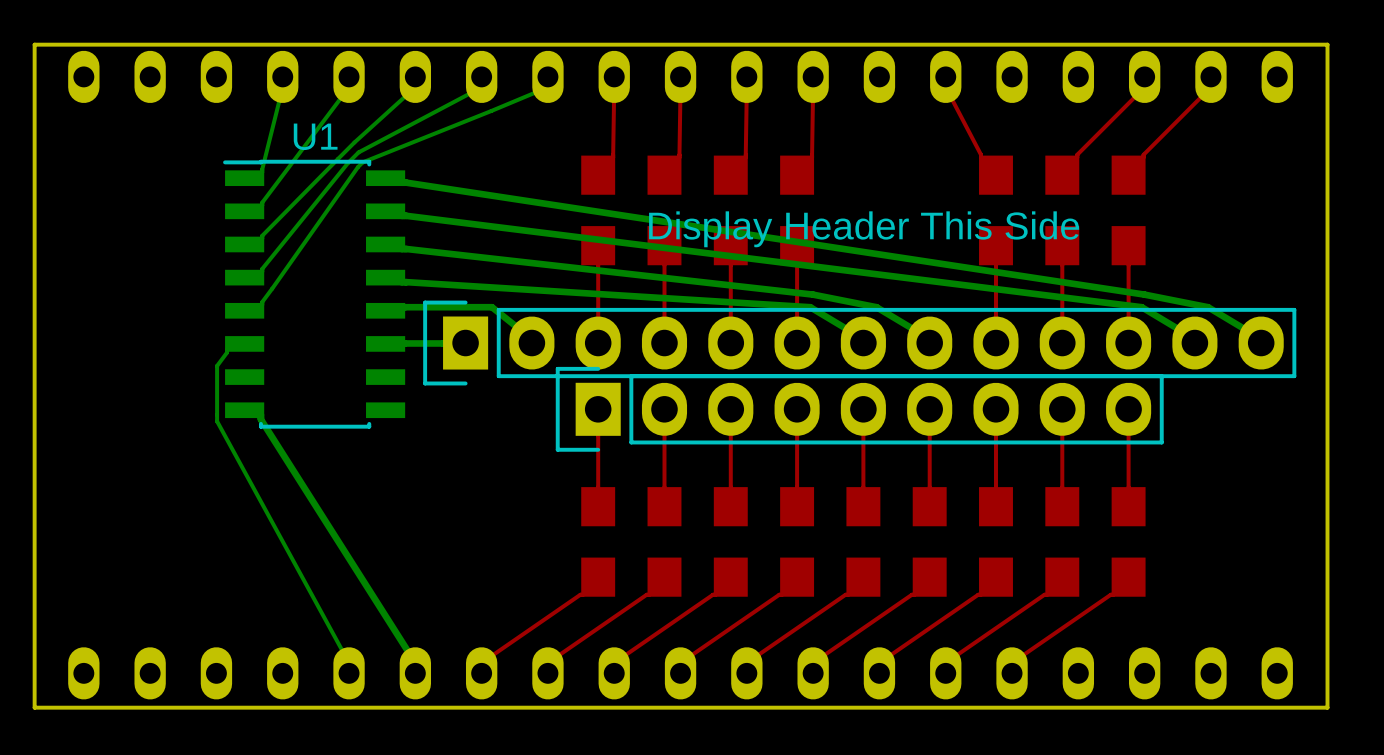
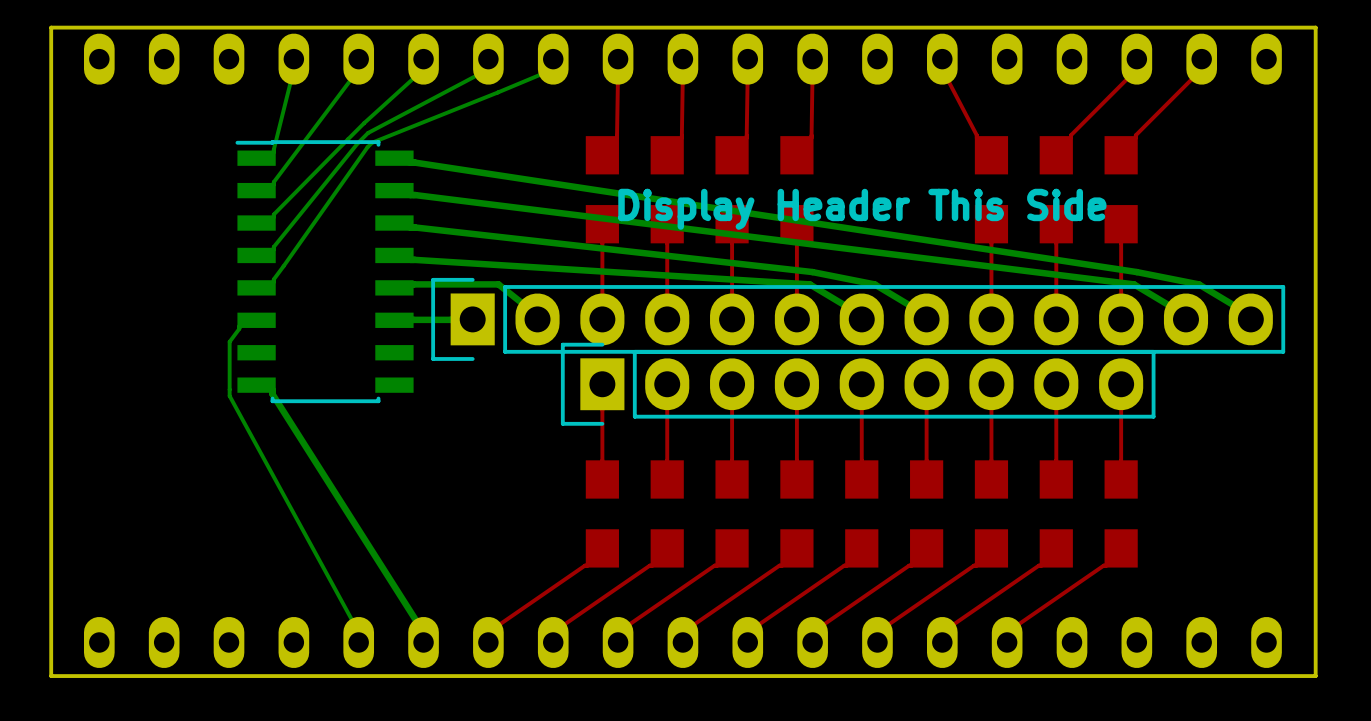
U1 name: U1 (315, 136) -> none

